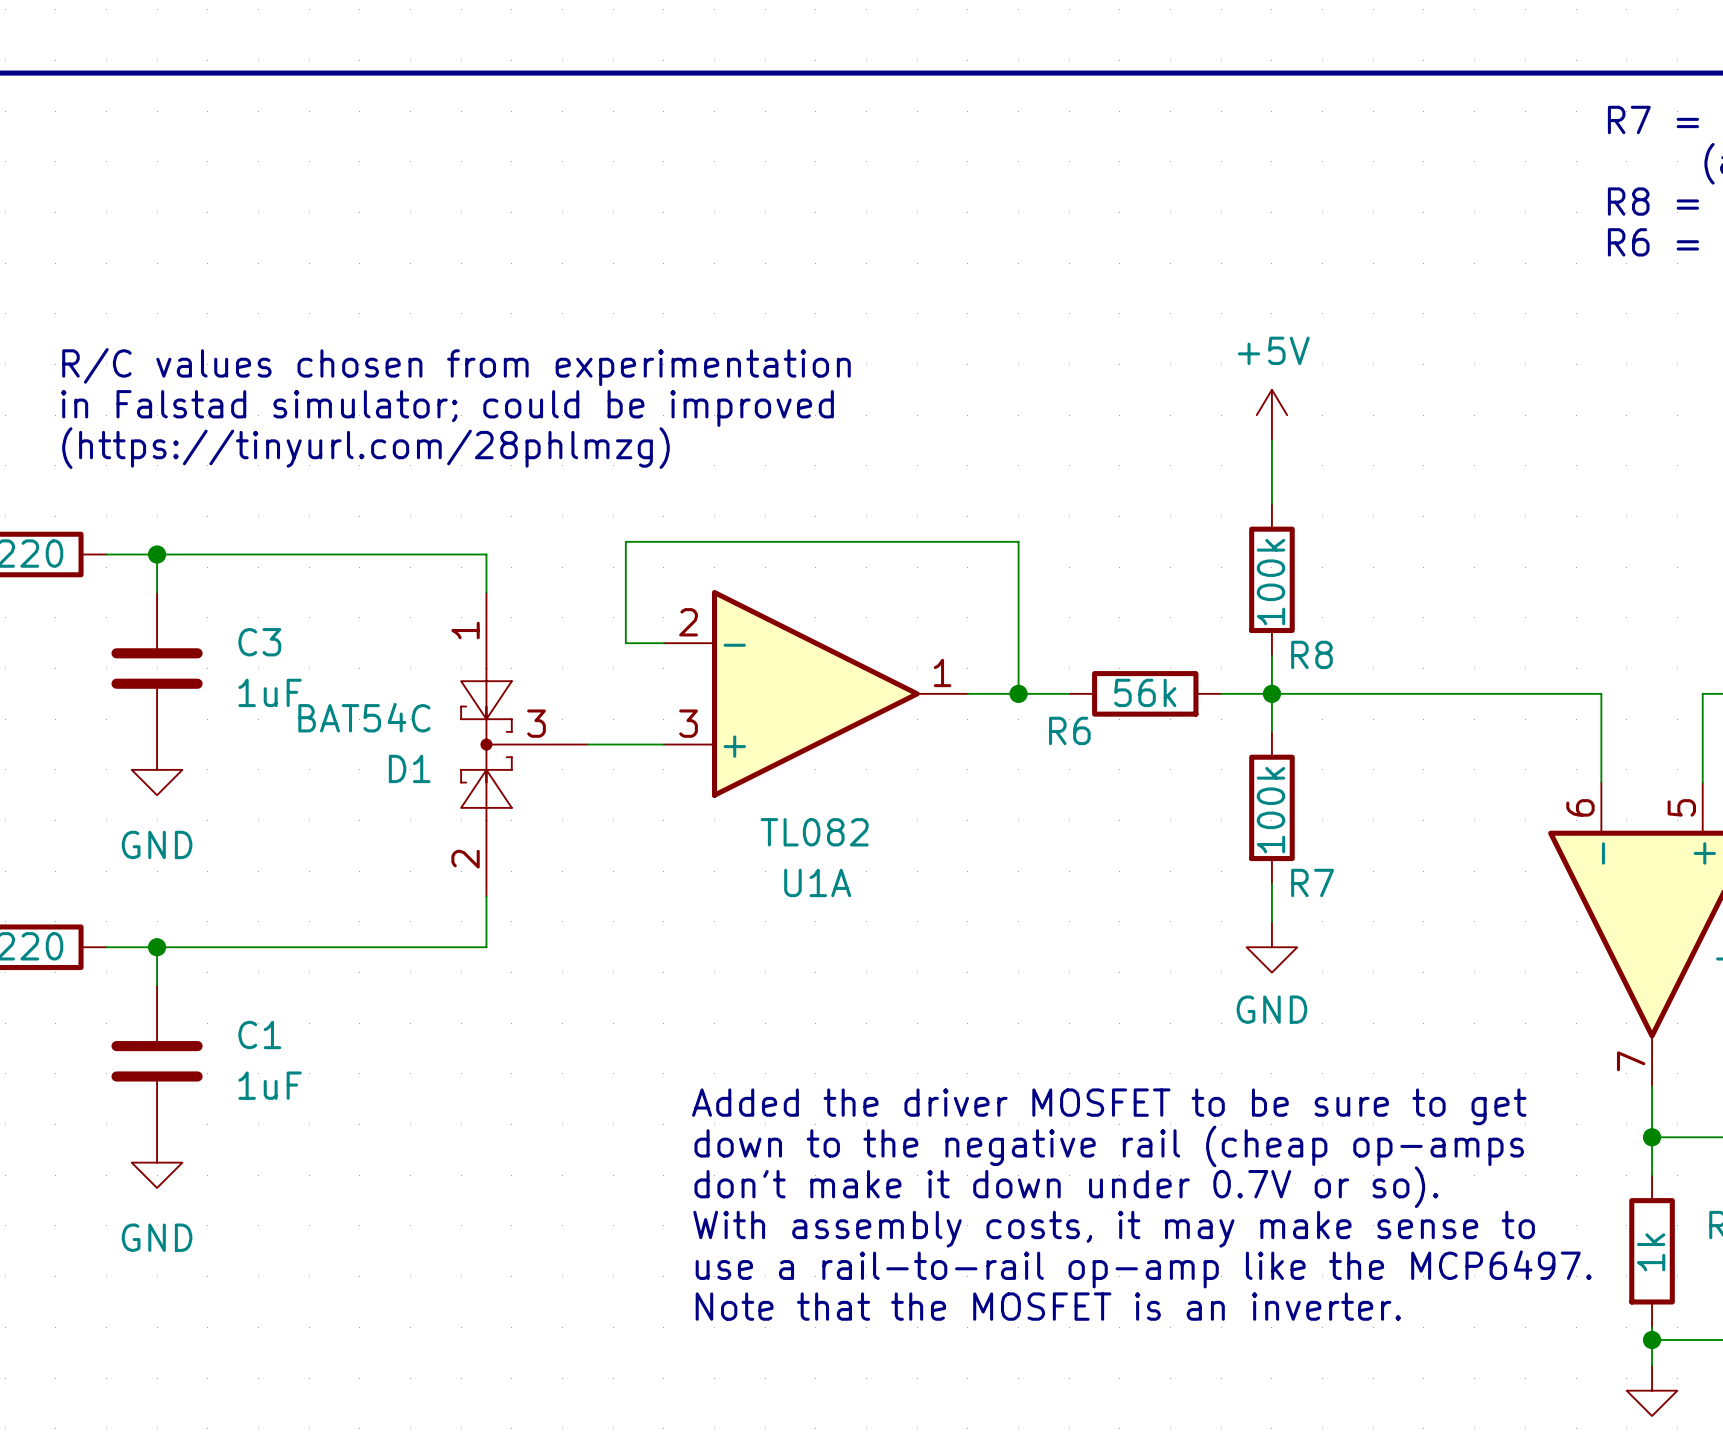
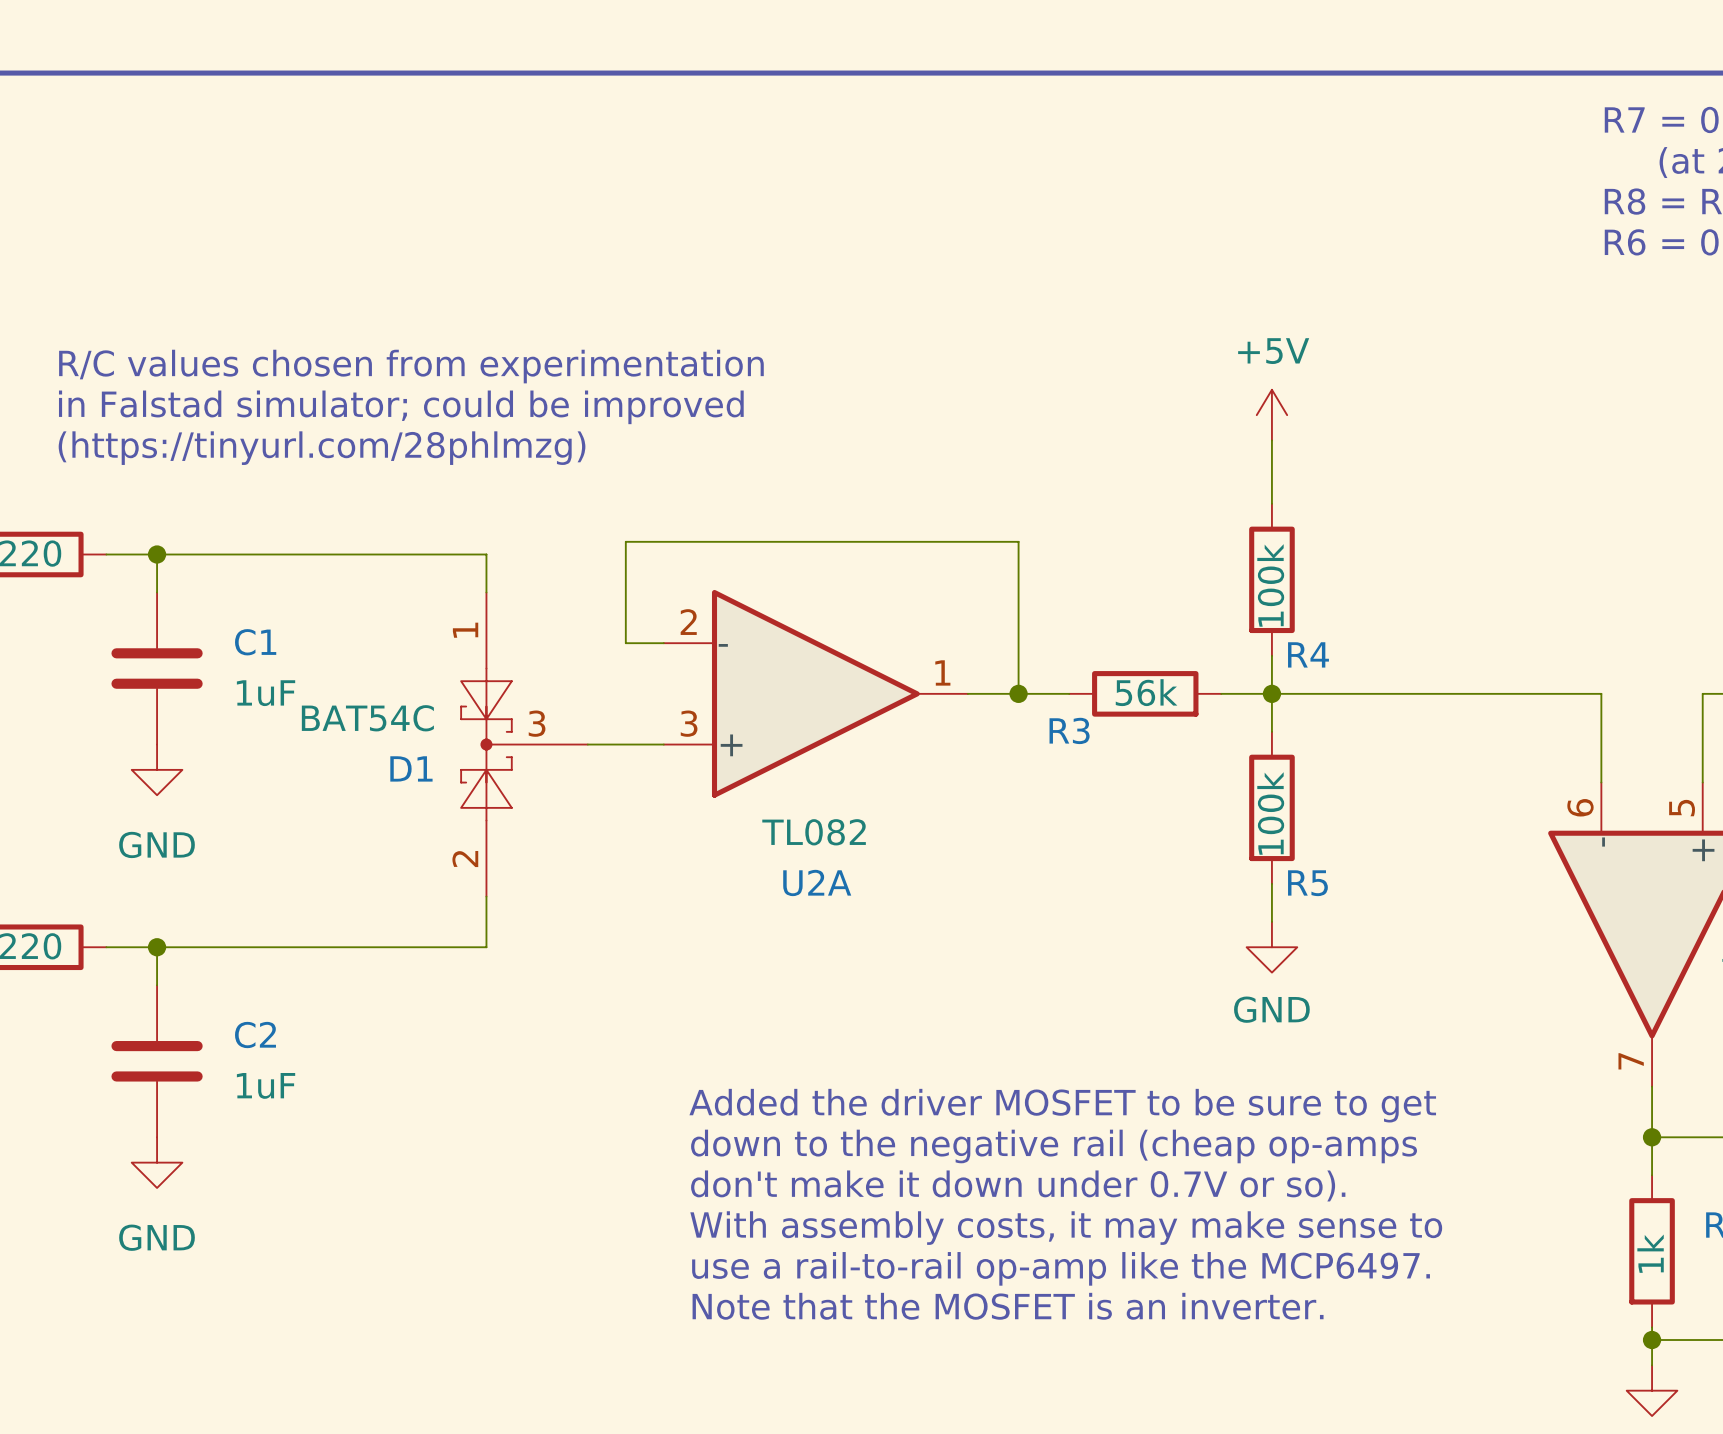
C3 name: C3 (259, 642) -> C1 (255, 642)
R8 name: R8 (1311, 654) -> R4 (1308, 654)
R6 name: R6 (1069, 730) -> R3 (1069, 730)
U1A name: U1A (817, 882) -> U2A (817, 882)
R7 name: R7 (1312, 882) -> R5 (1307, 883)
C1 name: C1 (259, 1034) -> C2 (255, 1035)

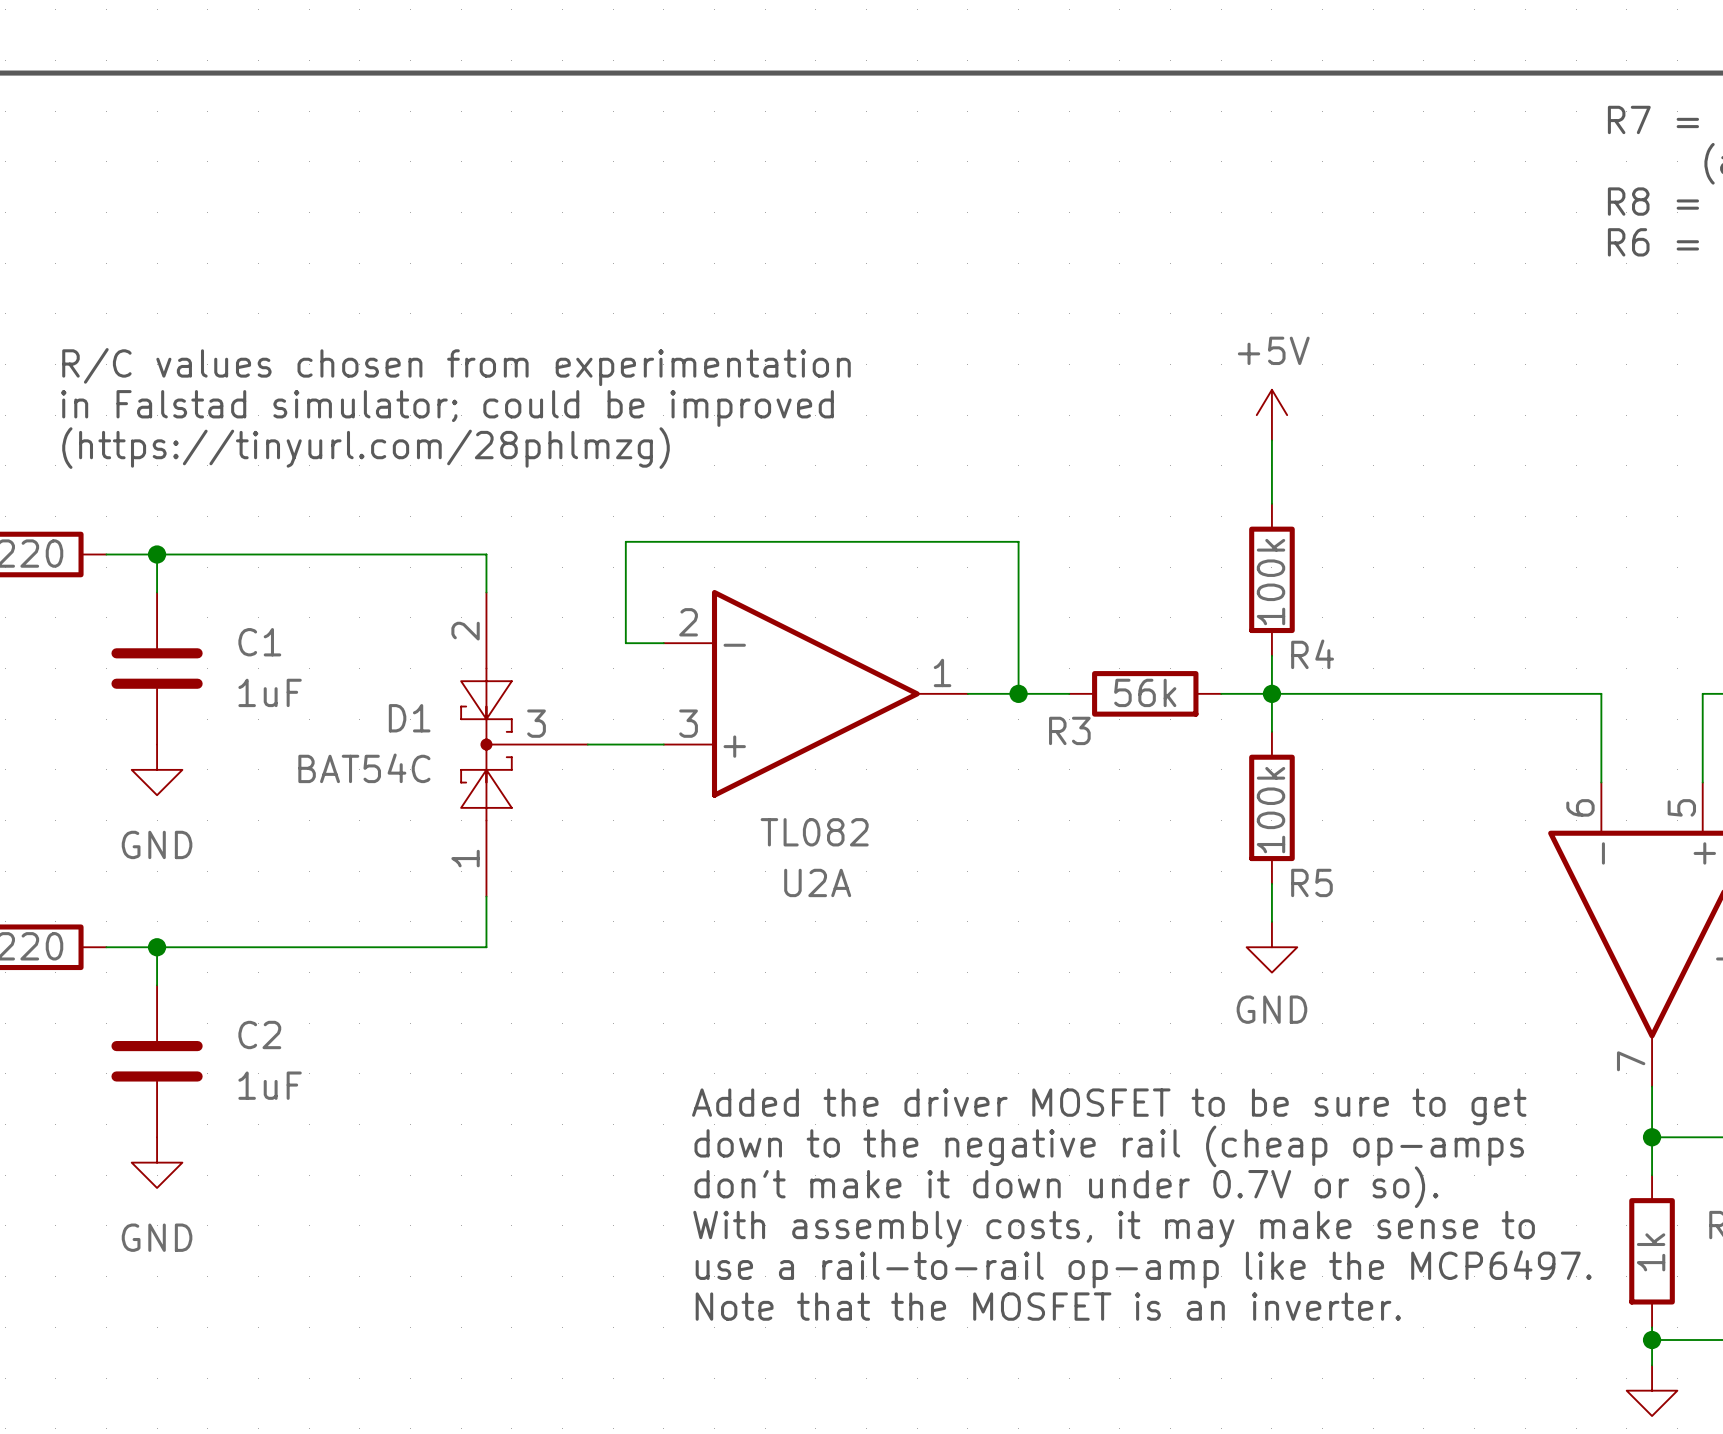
D1 flip: as is (486, 744) -> up-down (486, 744)

